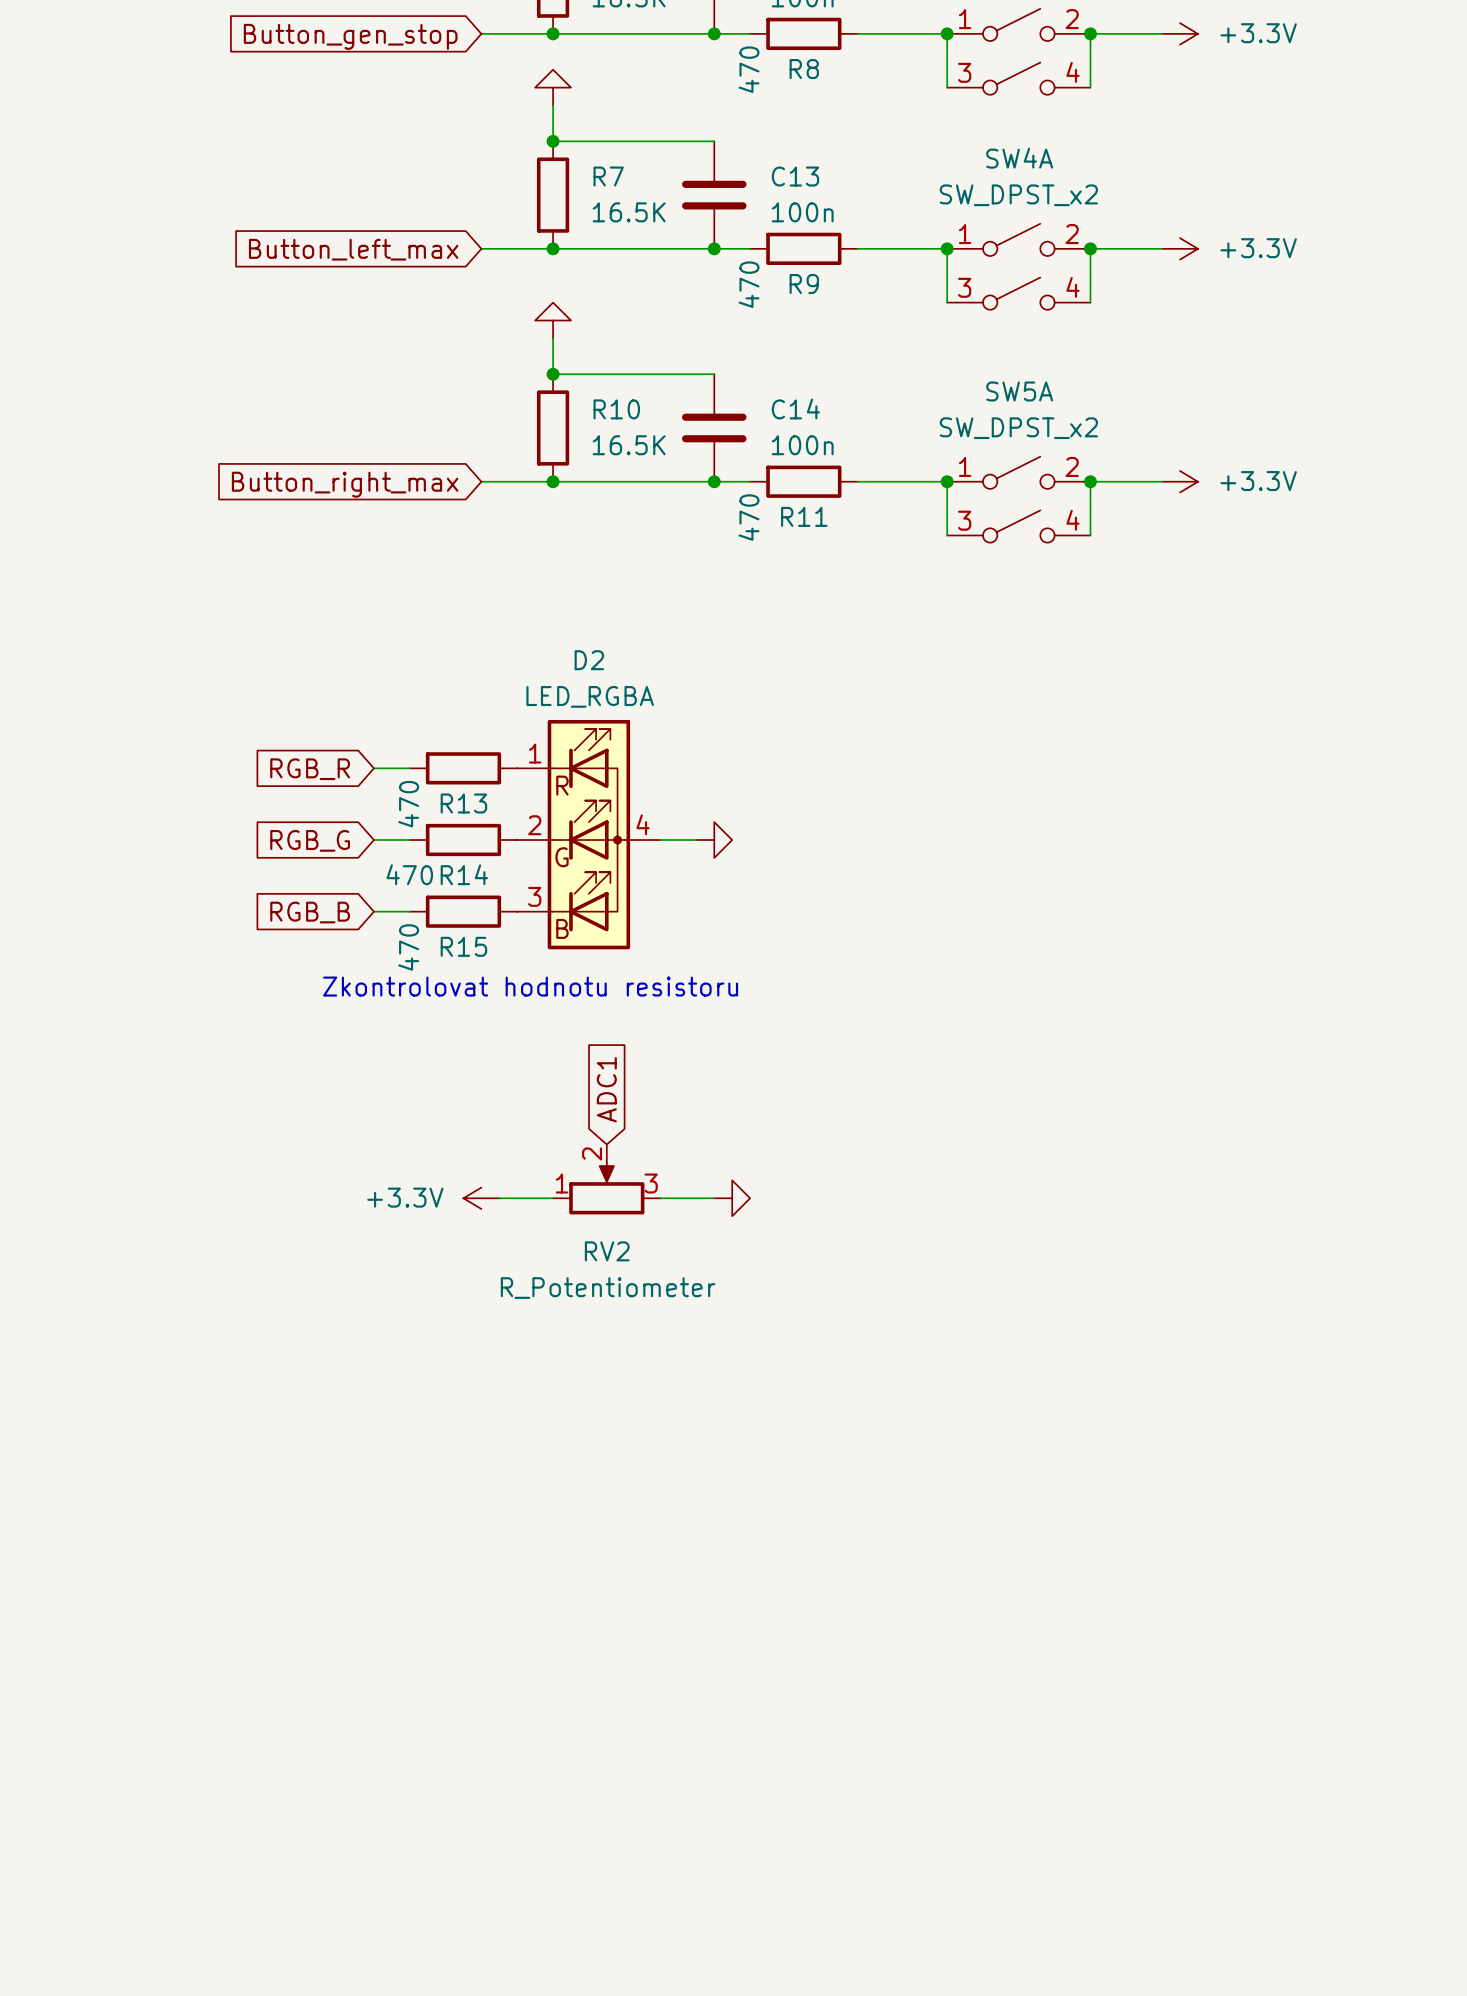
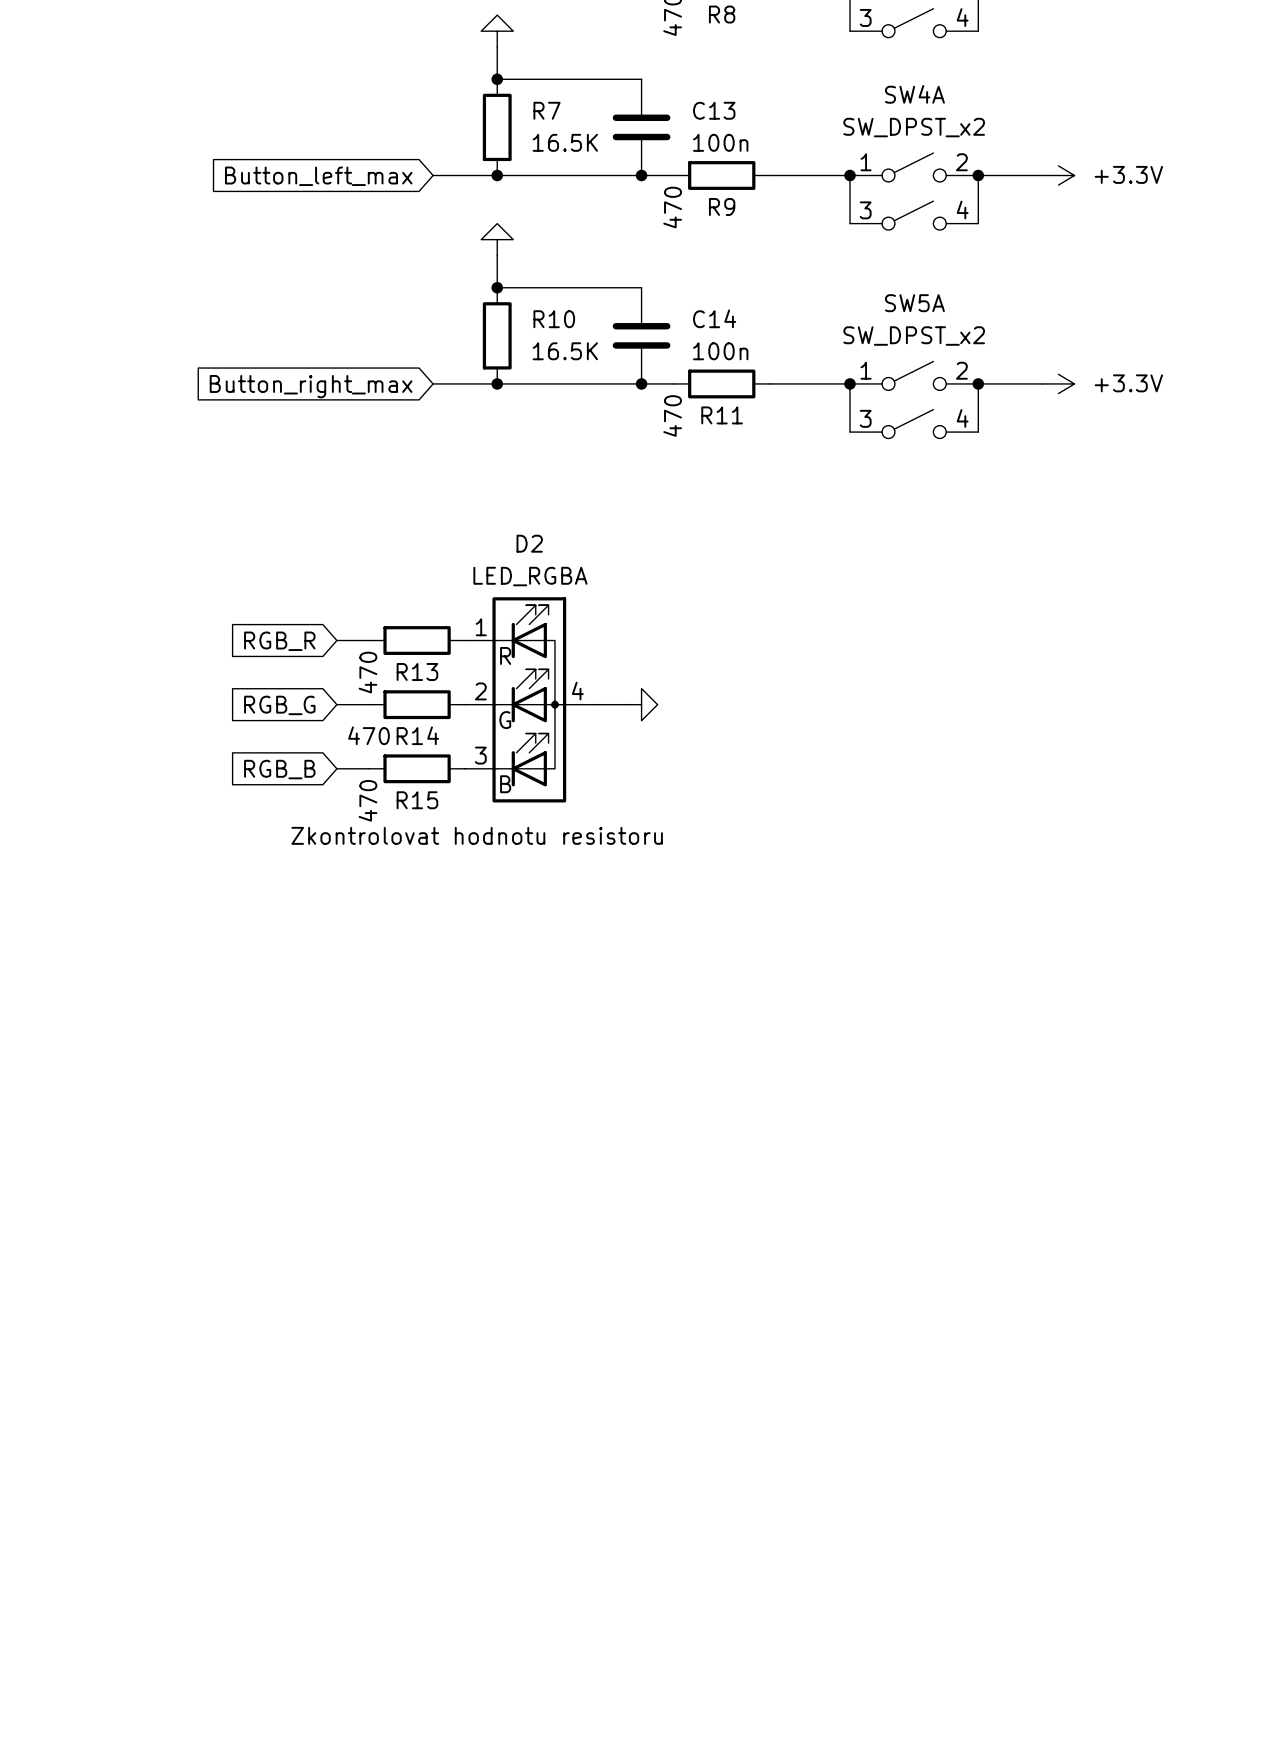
global label: ADC1 (606, 1089) -> none
RV2: R_Potentiometer (606, 1179) -> none
power symbol: +3.3V (481, 1198) -> none
wire: (499, 1198) (553, 1198) -> none
wire: (660, 1198) (714, 1198) -> none
power symbol: (732, 1198) -> none

